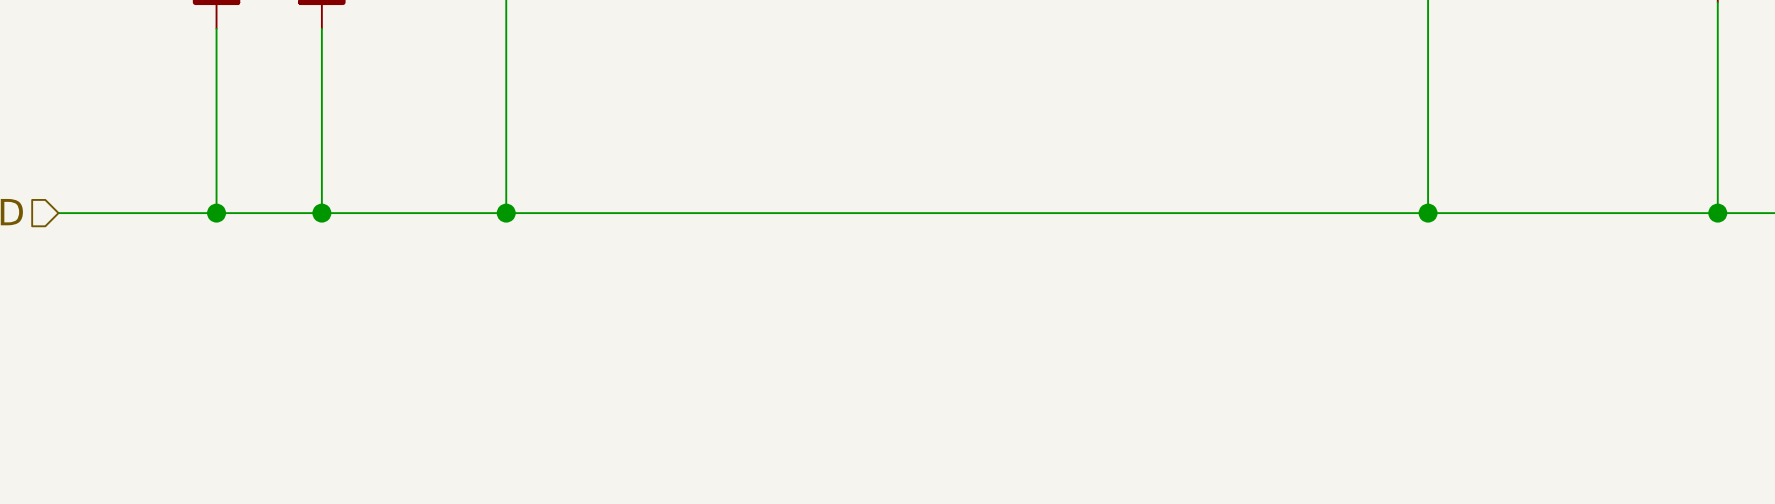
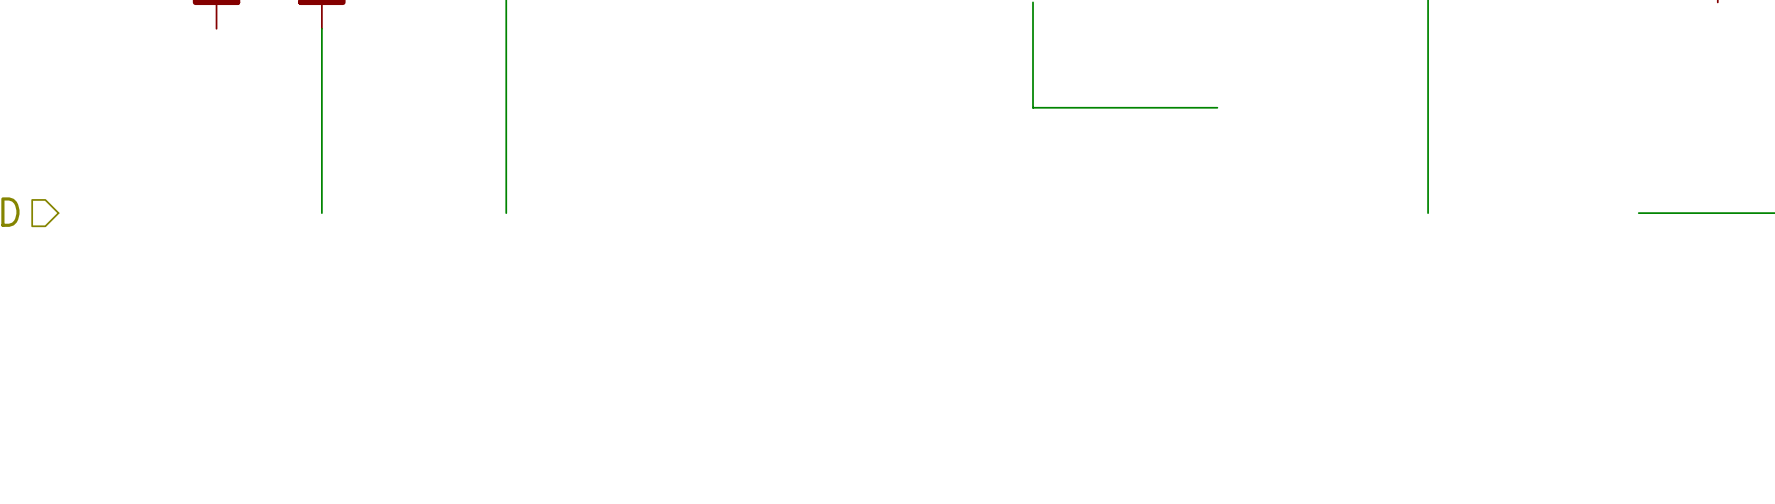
wire: none -> (1033, 2) (1033, 107) (1217, 107)
wire: (1717, 2) (1717, 213) -> none
wire: (216, 28) (216, 213) -> none
wire: (58, 213) (1638, 213) -> none
junction: (216, 213) -> none
junction: (321, 213) -> none
junction: (506, 213) -> none
junction: (1428, 213) -> none
junction: (1717, 213) -> none

